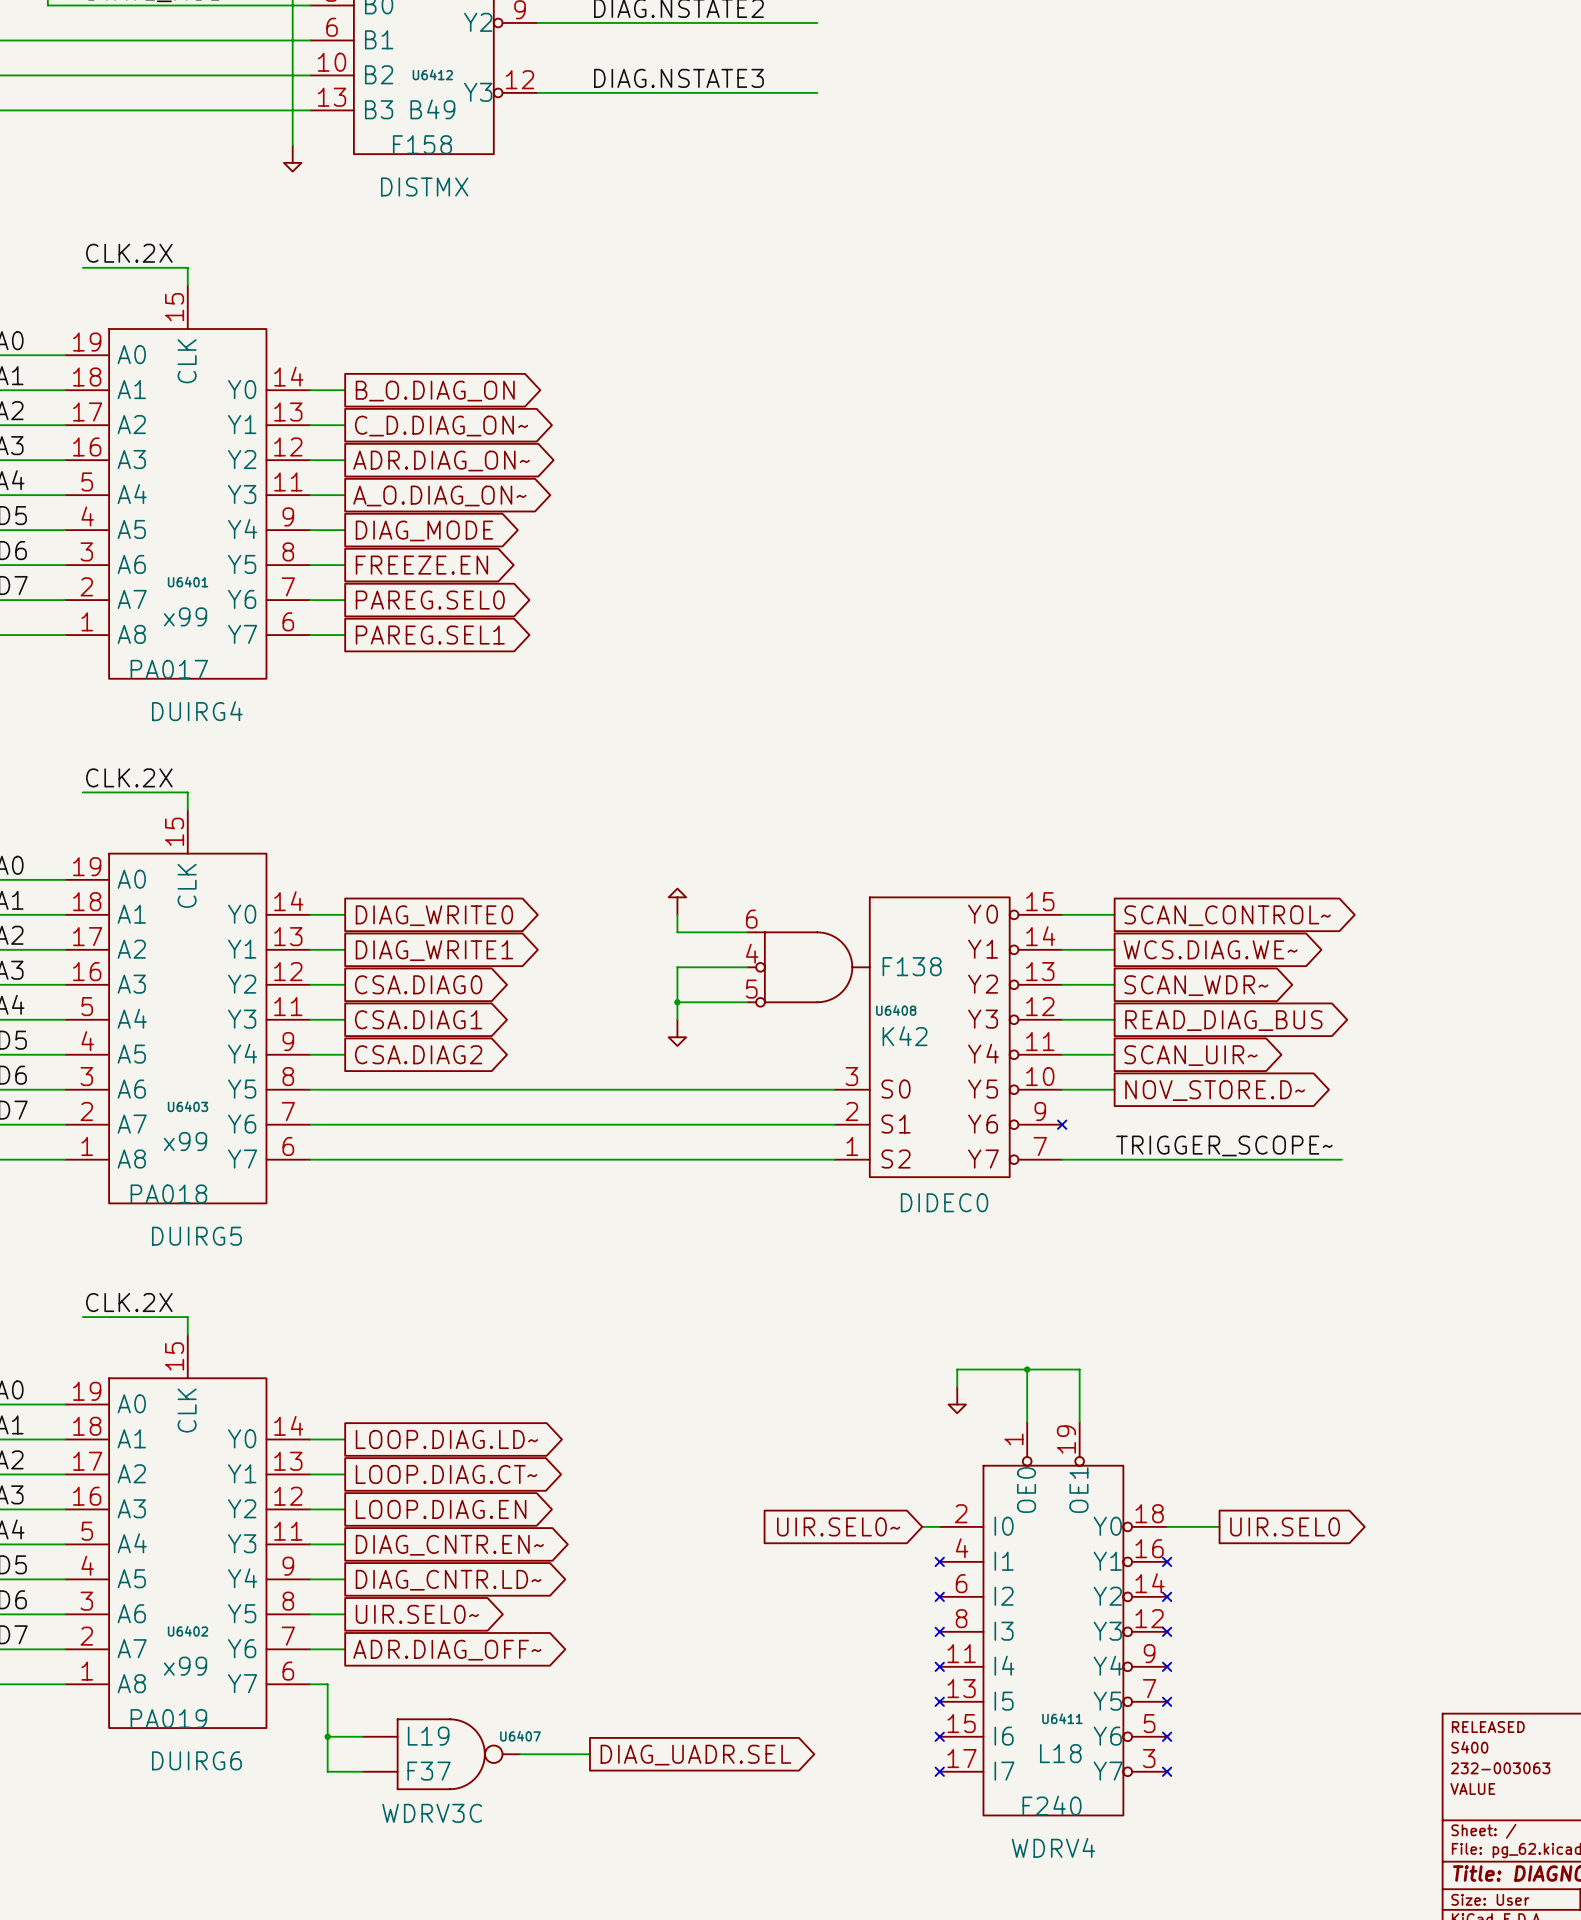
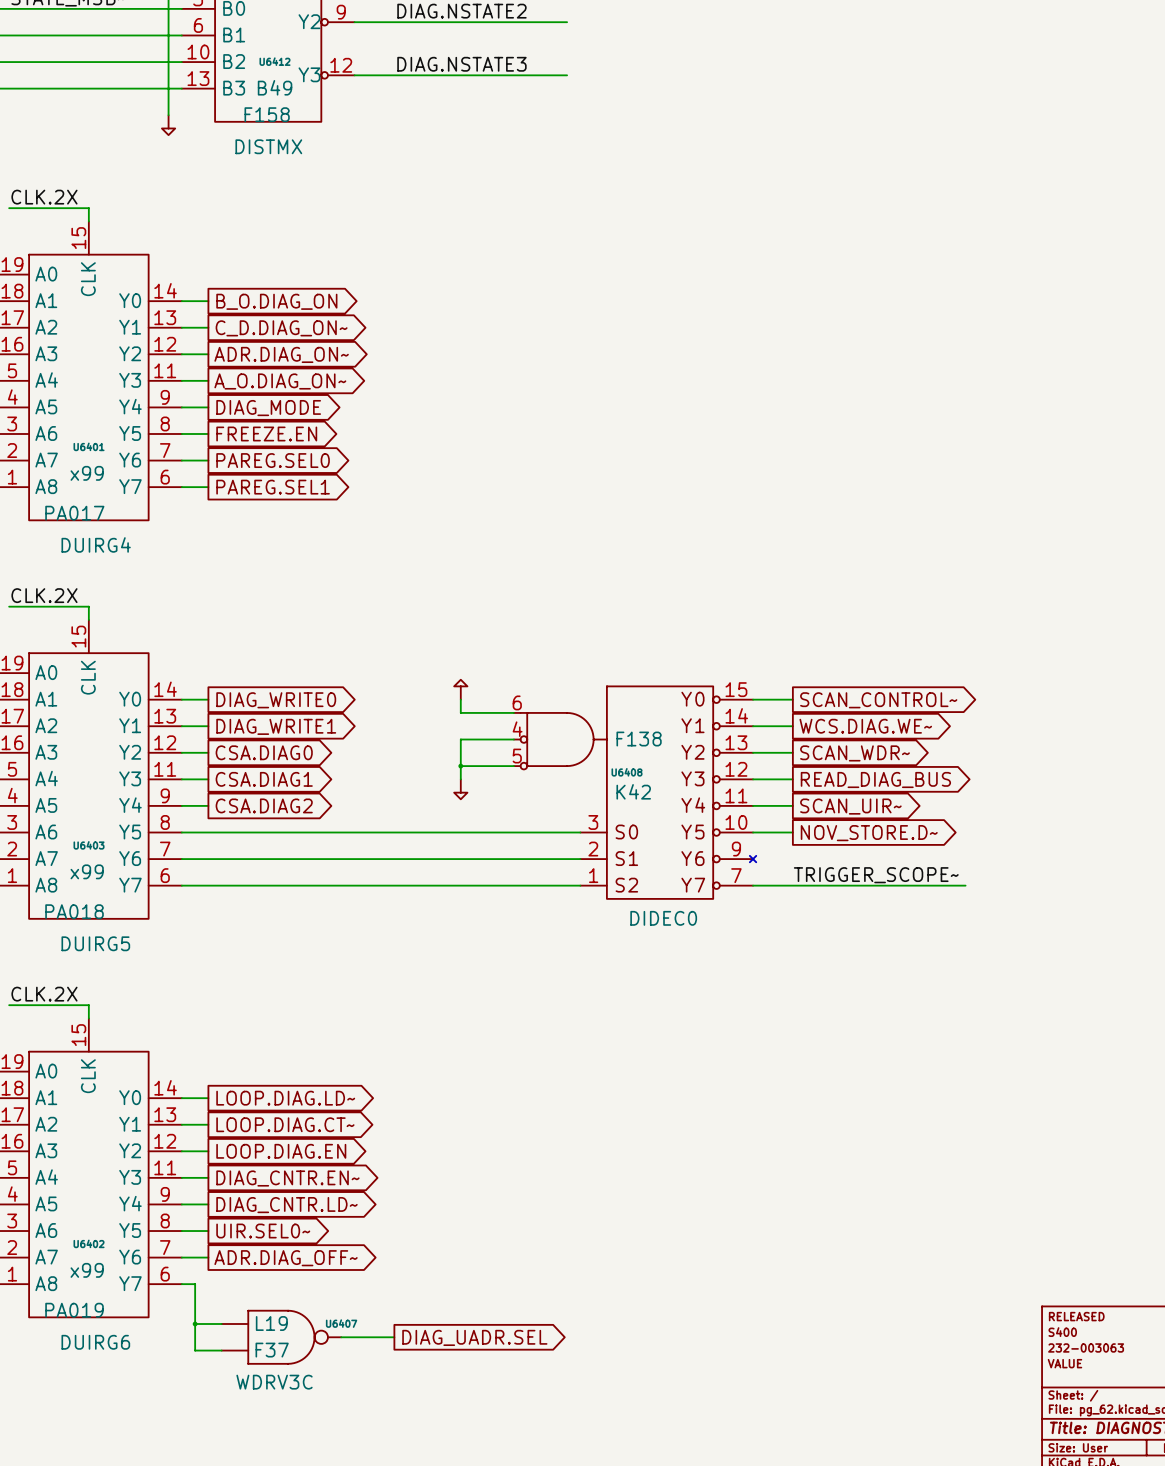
wire: (1027, 1369) (1027, 1421) -> none
junction: (1027, 1369) -> none
wire: (957, 1387) (957, 1369) (1079, 1369) (1079, 1421) -> none
power symbol: (957, 1400) -> none
global label: UIR.SEL0~ (838, 1526) -> none
wire: (922, 1526) (939, 1526) -> none
wire: (1167, 1526) (1219, 1526) -> none
global label: UIR.SEL0 (1285, 1526) -> none
no-connect mark: (939, 1561) -> none
no-connect mark: (1167, 1561) -> none
no-connect mark: (939, 1596) -> none
no-connect mark: (1167, 1596) -> none
U6411: F240 (1053, 1618) -> none
no-connect mark: (939, 1631) -> none
no-connect mark: (1167, 1631) -> none
no-connect mark: (939, 1666) -> none
no-connect mark: (1167, 1666) -> none
no-connect mark: (939, 1701) -> none
no-connect mark: (1167, 1701) -> none
no-connect mark: (939, 1736) -> none
no-connect mark: (1167, 1736) -> none
no-connect mark: (939, 1771) -> none
no-connect mark: (1167, 1771) -> none

